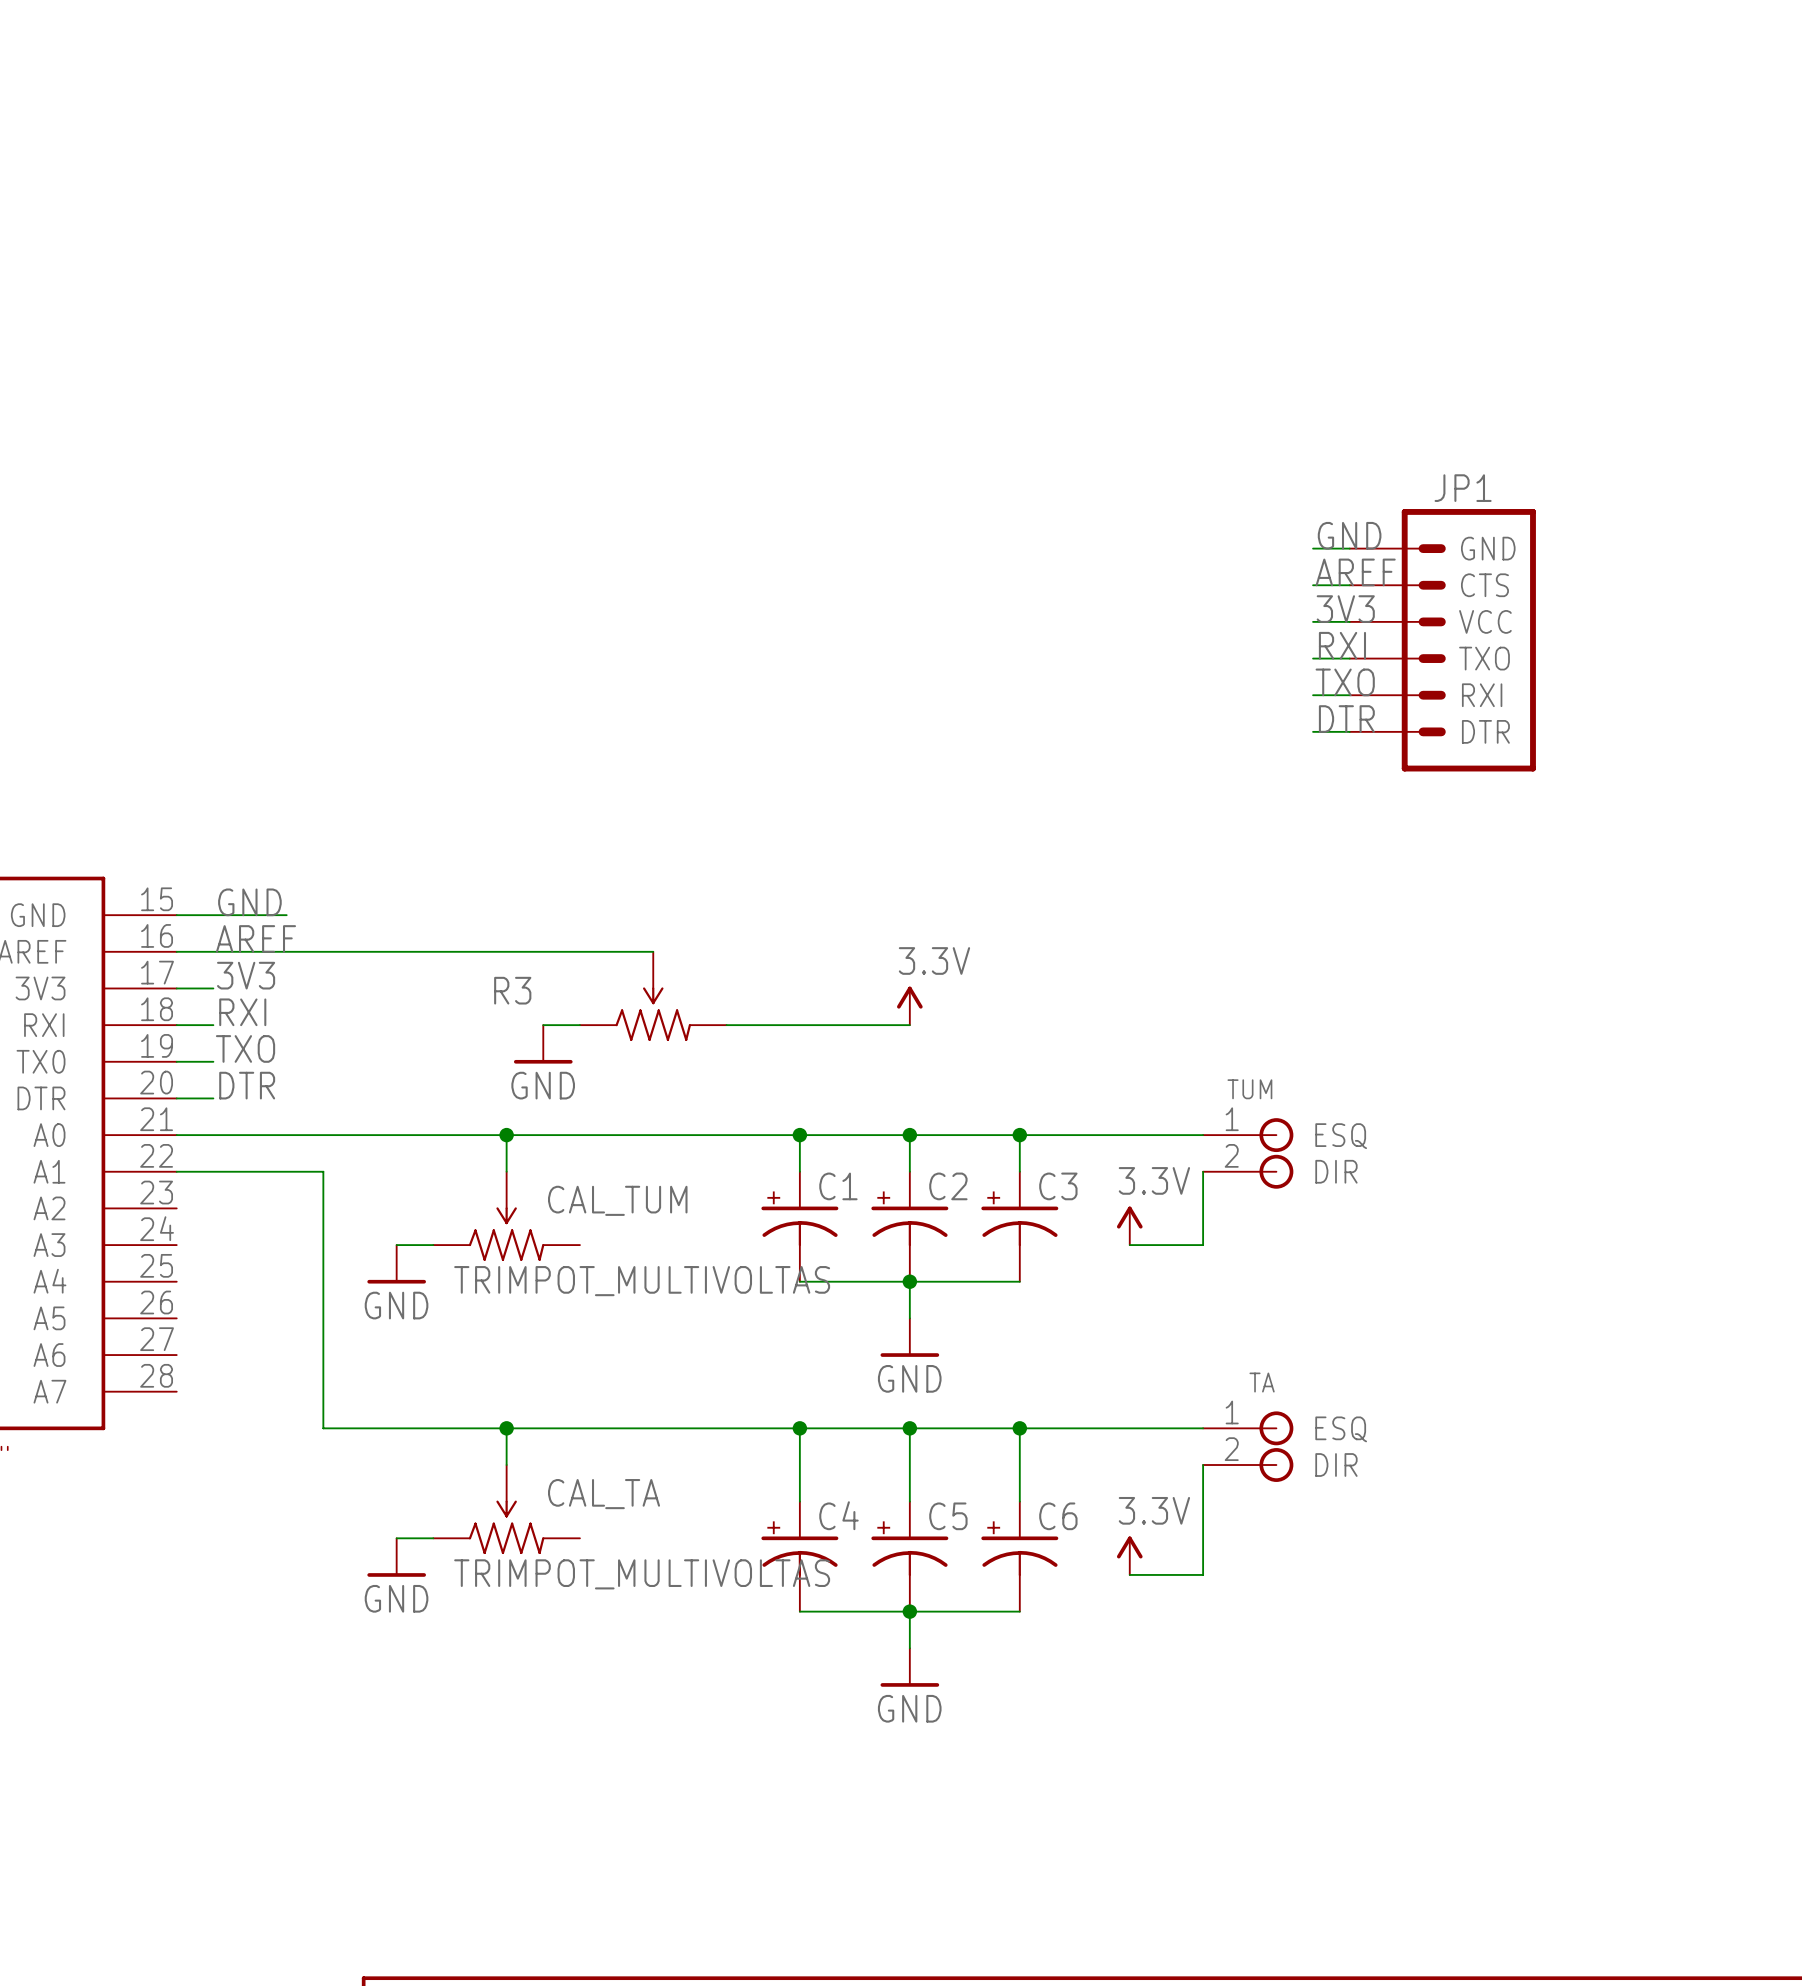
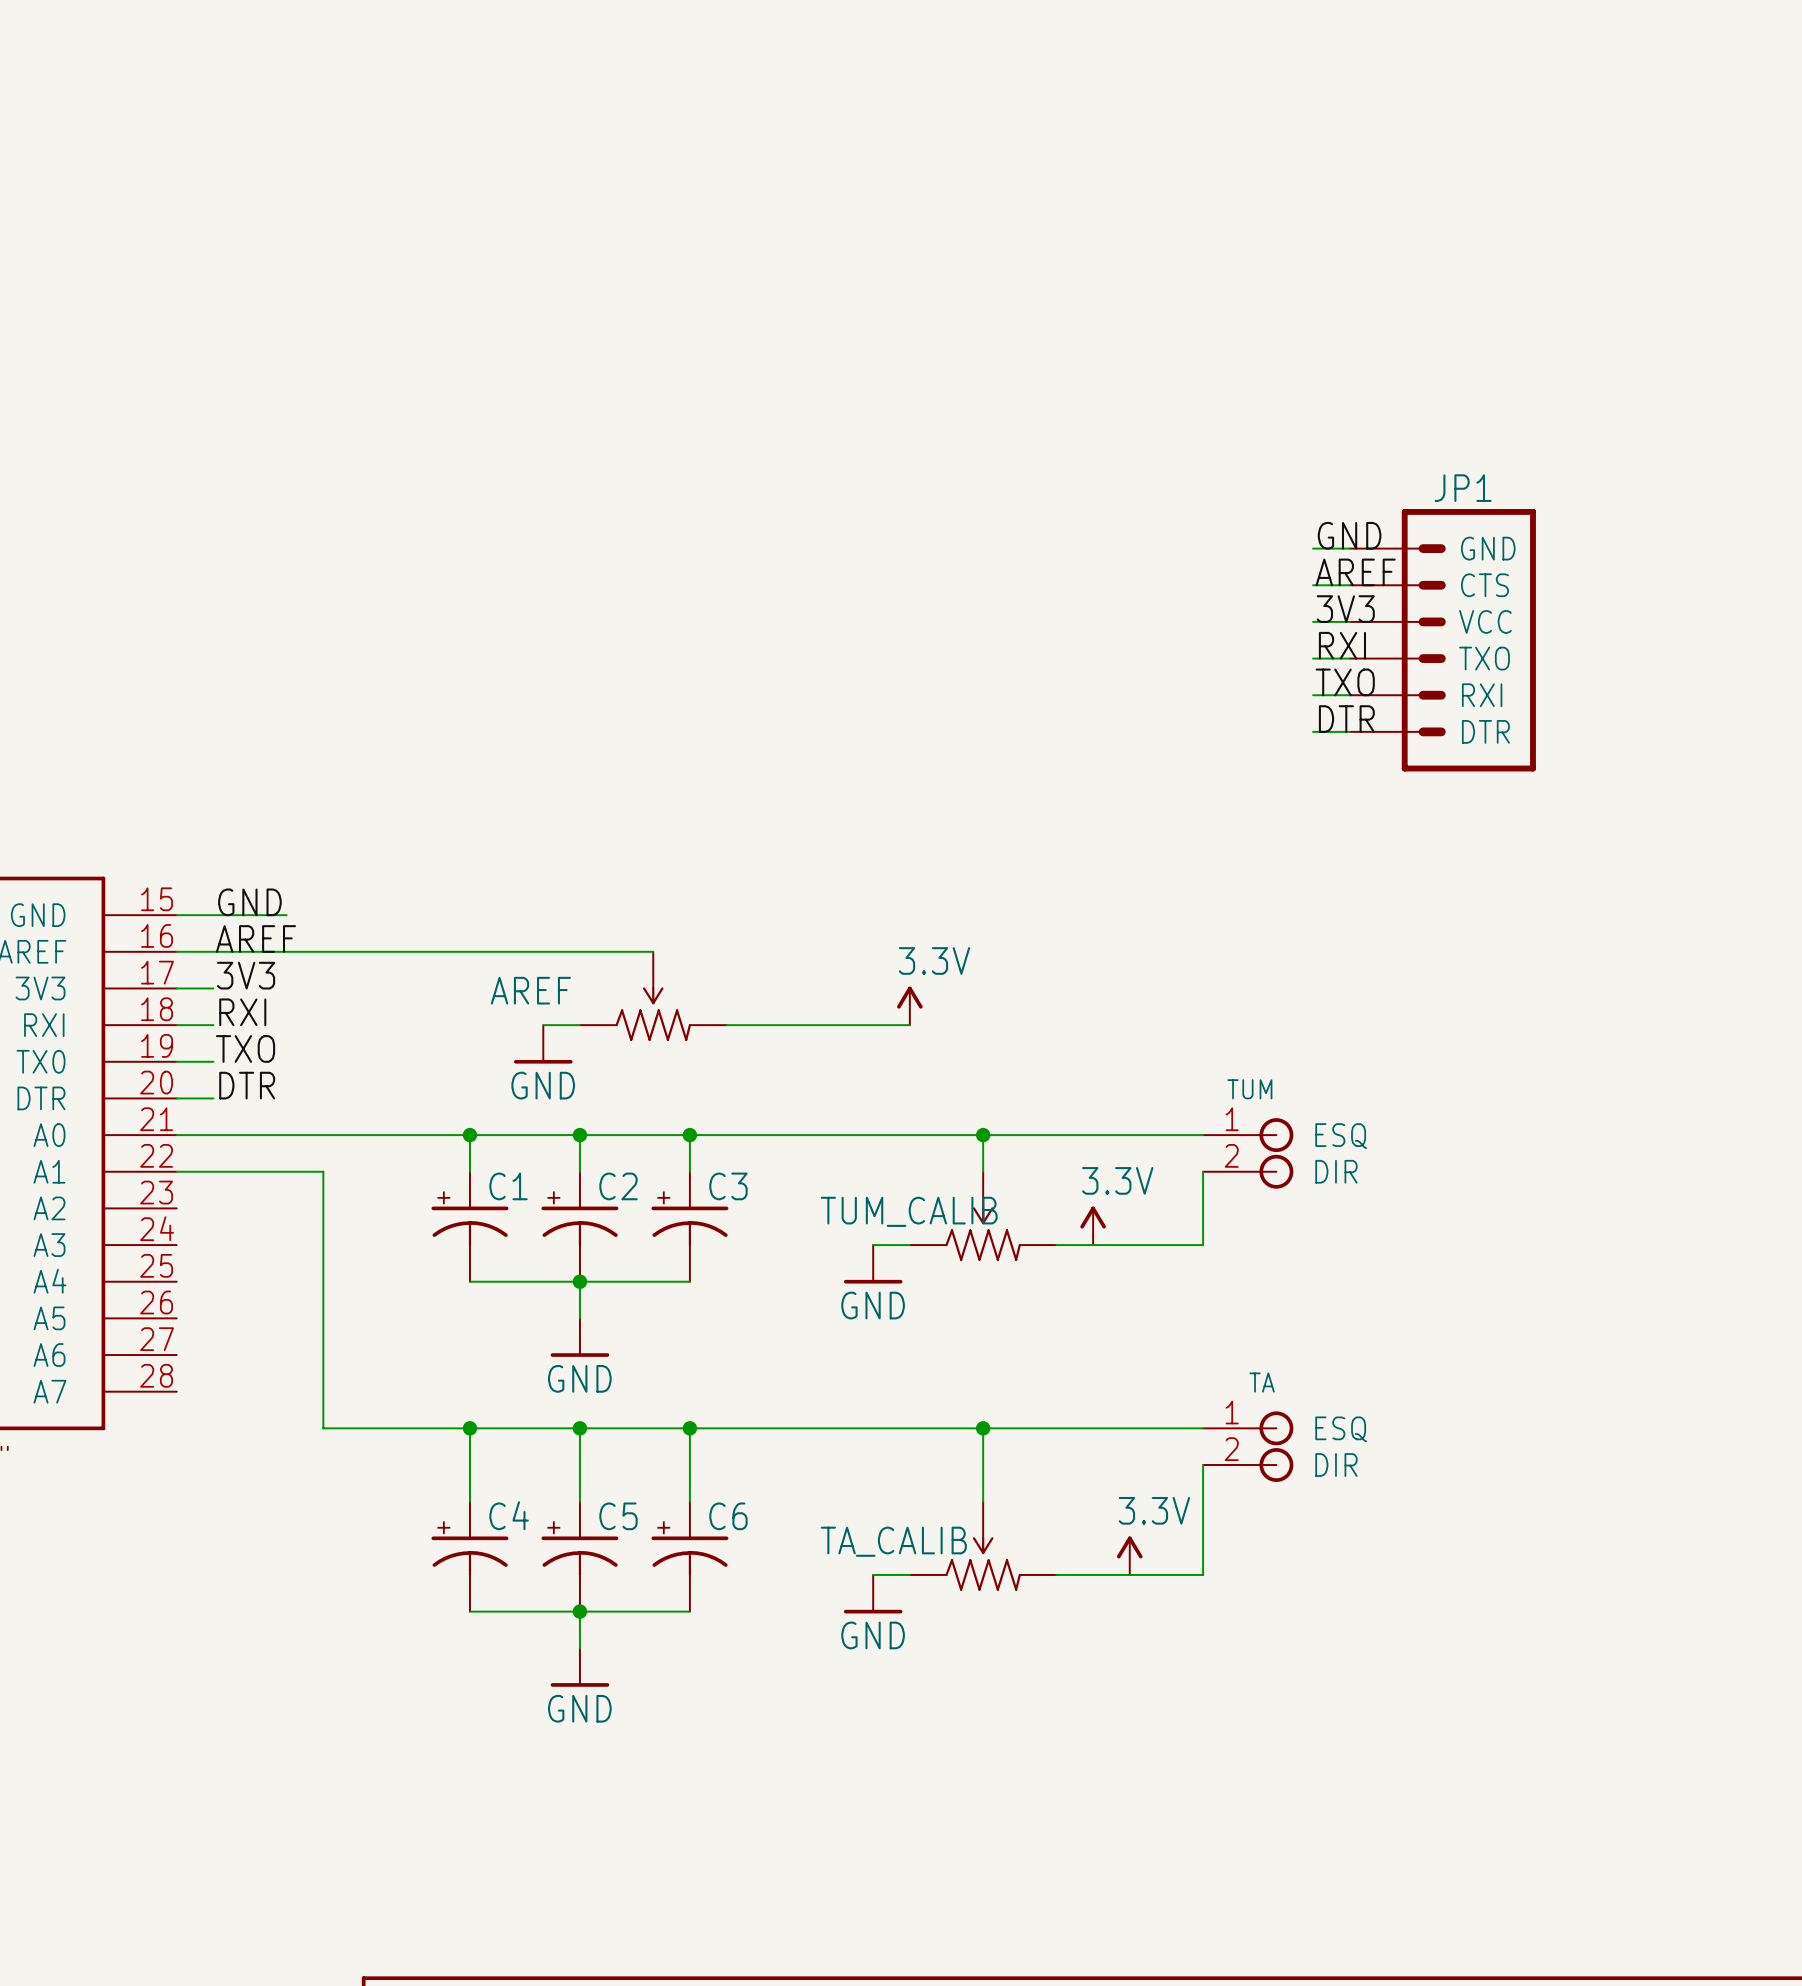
R3 name: R3 (512, 990) -> AREF (530, 990)
junction: none -> (469, 1135)
wire: (506, 1135) (506, 1171) -> none
junction: (506, 1135) -> none
junction: none -> (579, 1135)
junction: none -> (689, 1135)
wire: (799, 1135) (799, 1171) -> (469, 1135) (469, 1171)
junction: (799, 1135) -> none
wire: (909, 1135) (909, 1171) -> (579, 1135) (579, 1171)
junction: (909, 1135) -> none
wire: none -> (983, 1135) (983, 1171)
junction: none -> (983, 1135)
wire: (1019, 1135) (1019, 1171) -> (689, 1135) (689, 1171)
junction: (1019, 1135) -> none
CAL_TUM: TRIMPOT_MULTIVOLTAS (506, 1216) -> none
TUM_CALIB: none -> (983, 1216)
power symbol position: 3.3V (1129, 1225) -> 3.3V (1093, 1225)
C1 position: (799, 1226) -> (469, 1226)
C2 position: (909, 1226) -> (579, 1226)
C3 position: (1019, 1226) -> (689, 1226)
wire: (396, 1245) (433, 1245) -> none
wire: none -> (873, 1245) (909, 1245)
wire: none -> (1056, 1245) (1129, 1245)
power symbol: GND (396, 1264) -> none
junction: none -> (579, 1281)
wire: (799, 1281) (1019, 1281) -> (469, 1281) (689, 1281)
wire: (909, 1281) (909, 1318) -> (579, 1281) (579, 1318)
junction: (909, 1281) -> none
power symbol: none -> GND (579, 1337)
power symbol position: GND (909, 1337) -> GND (873, 1264)
junction: none -> (469, 1428)
wire: (506, 1428) (506, 1465) -> none
junction: (506, 1428) -> none
junction: none -> (579, 1428)
junction: none -> (689, 1428)
wire: (799, 1428) (799, 1501) -> (469, 1428) (469, 1501)
junction: (799, 1428) -> none
wire: (909, 1428) (909, 1501) -> (579, 1428) (579, 1501)
junction: (909, 1428) -> none
wire: none -> (983, 1428) (983, 1501)
junction: none -> (983, 1428)
wire: (1019, 1428) (1019, 1501) -> (689, 1428) (689, 1501)
junction: (1019, 1428) -> none
CAL_TA: TRIMPOT_MULTIVOLTAS (506, 1509) -> none
wire: (396, 1538) (433, 1538) -> none
TA_CALIB: none -> (983, 1546)
C4 position: (799, 1556) -> (469, 1556)
C5 position: (909, 1556) -> (579, 1556)
C6 position: (1019, 1556) -> (689, 1556)
power symbol: GND (396, 1557) -> none
wire: none -> (873, 1574) (909, 1574)
wire: none -> (1056, 1574) (1129, 1574)
junction: none -> (579, 1611)
wire: (799, 1611) (1019, 1611) -> (469, 1611) (689, 1611)
wire: (909, 1611) (909, 1648) -> (579, 1611) (579, 1648)
junction: (909, 1611) -> none
power symbol: none -> GND (579, 1667)
power symbol position: GND (909, 1667) -> GND (873, 1594)

